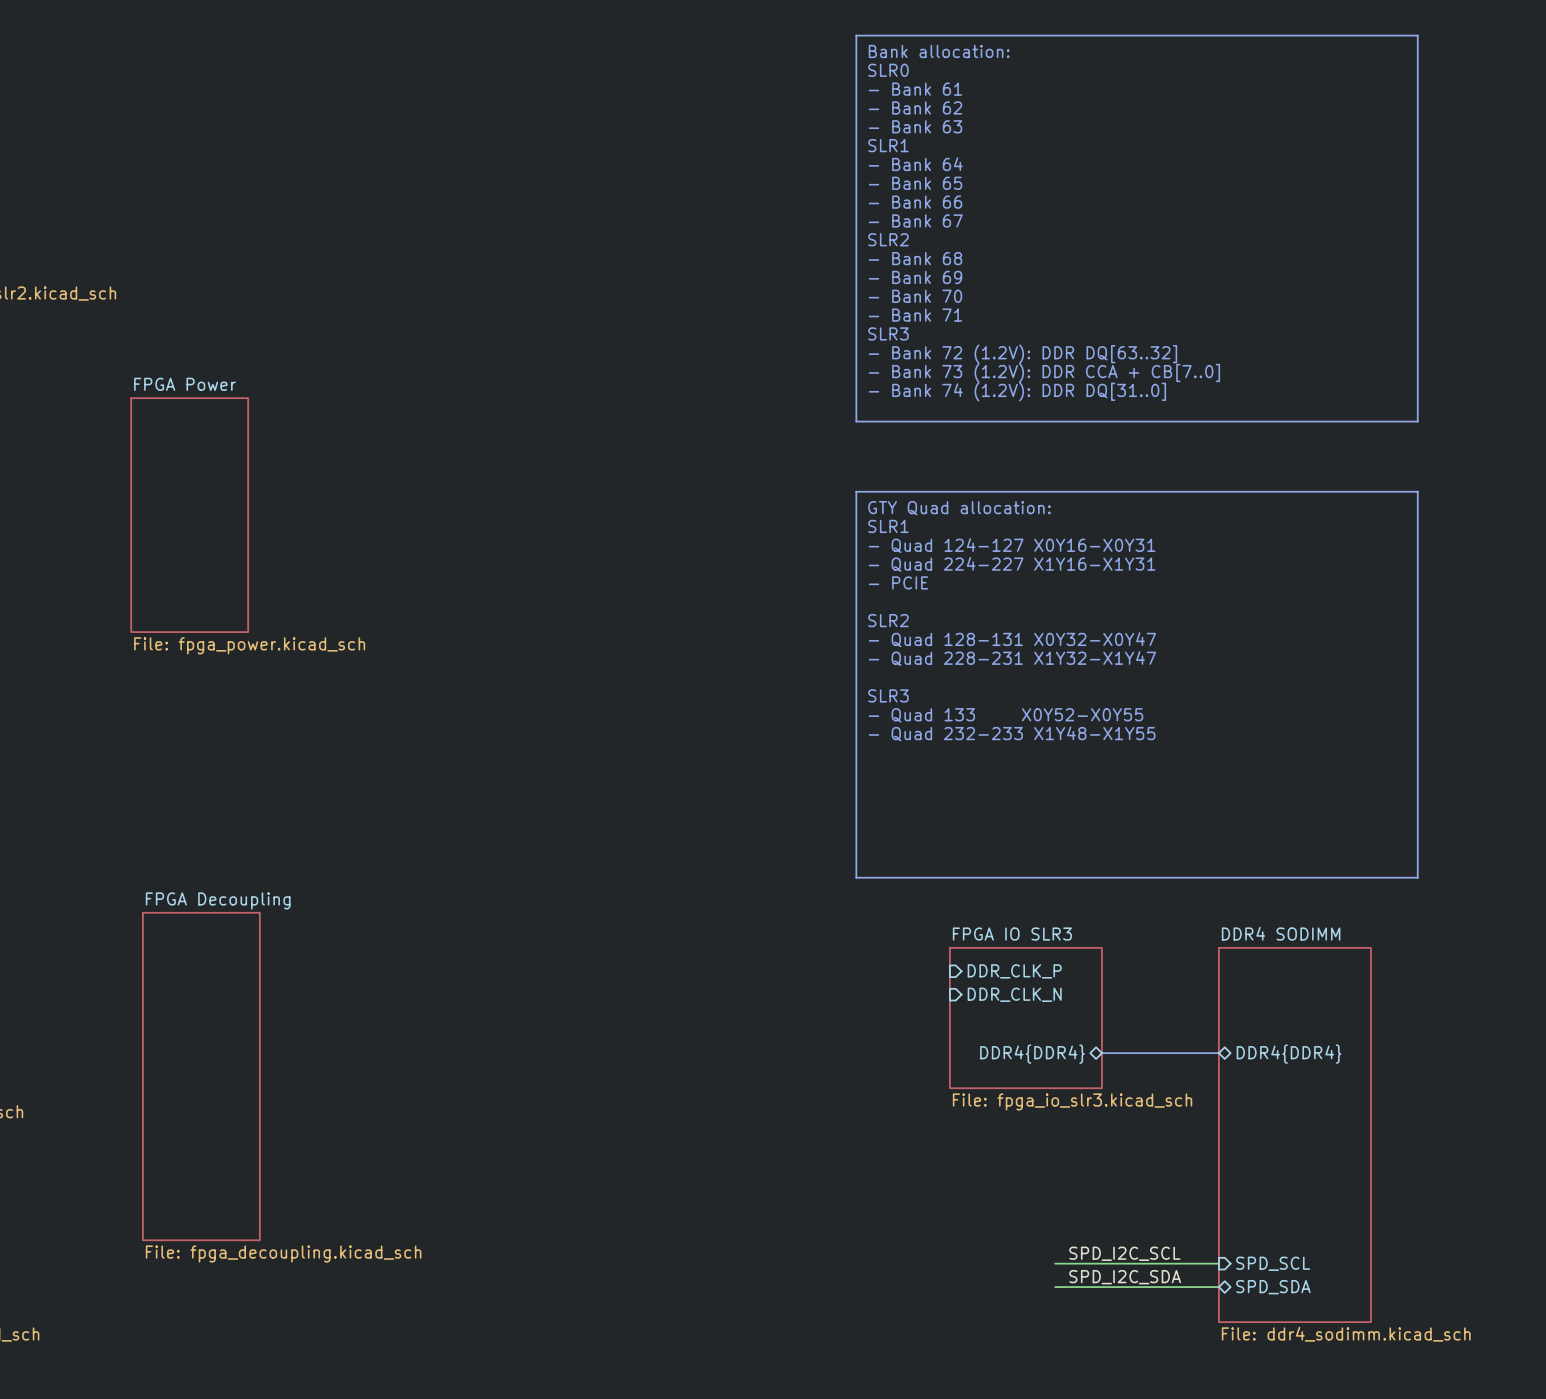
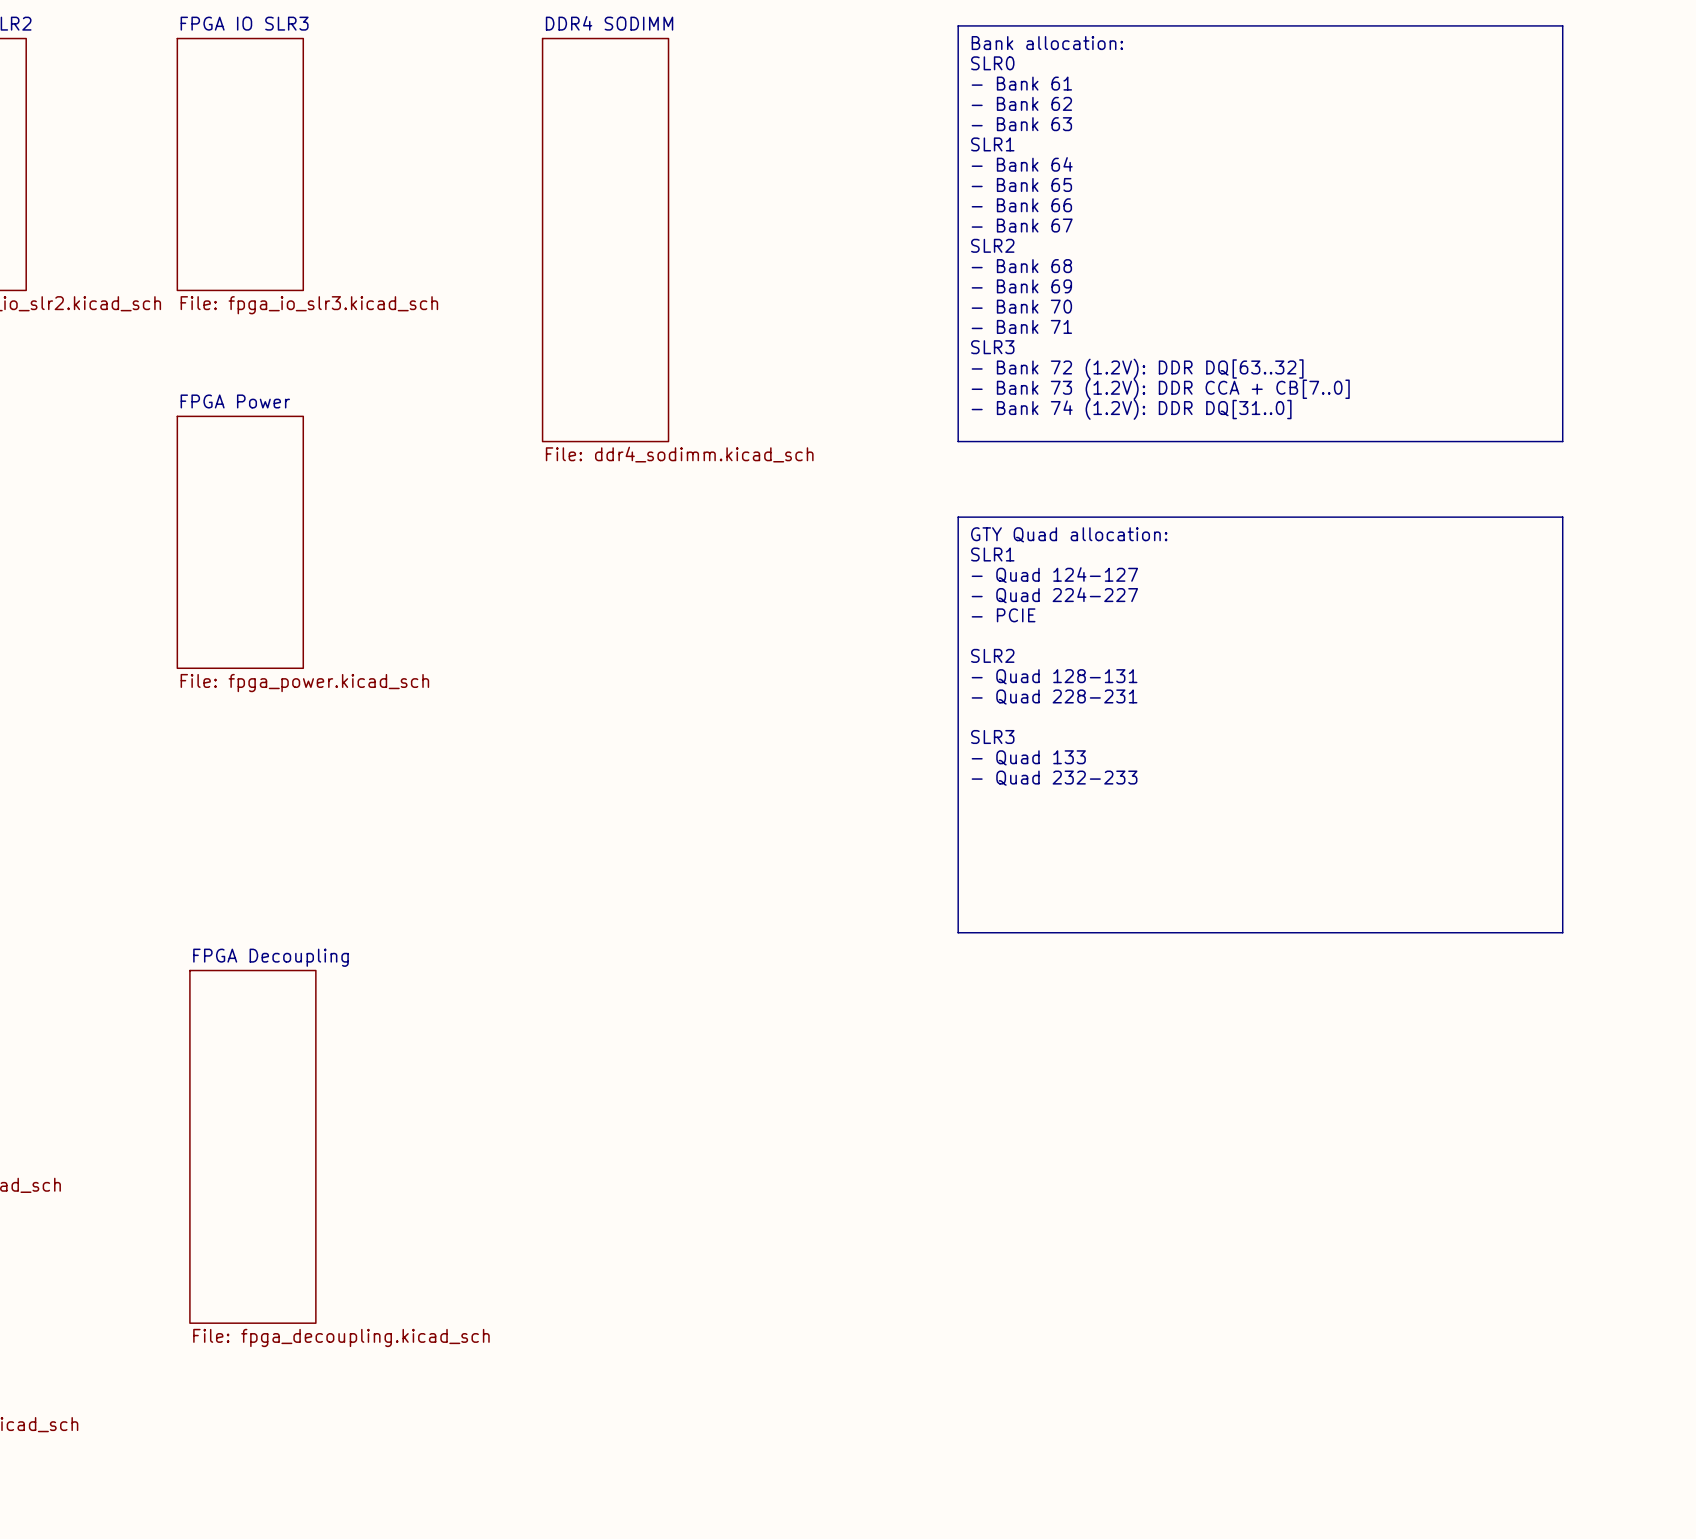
text: - Quad 124-127 X0Y16-X0Y31 (1012, 545) -> - Quad 124-127 (1054, 575)
text: - Quad 224-227 X1Y16-X1Y31 (1012, 564) -> - Quad 224-227 (1054, 595)
text: - Quad 128-131 X0Y32-X0Y47 (1012, 639) -> - Quad 128-131 (1054, 676)
text: - Quad 228-231 X1Y32-X1Y47 (1012, 658) -> - Quad 228-231 (1054, 697)
text: - Quad 133 X0Y52-X0Y55 (1005, 715) -> - Quad 133 (1028, 757)
text: - Quad 232-233 X1Y48-X1Y55 (1012, 733) -> - Quad 232-233 (1054, 778)
sheet FPGA IO SLR3 name position: FPGA IO SLR3 (1012, 934) -> FPGA IO SLR3 (244, 23)
sheet FPGA IO SLR3 shape: [949, 947, 1103, 1089] -> [176, 37, 305, 292]
sheet DDR4 SODIMM shape: [1218, 947, 1372, 1323] -> [541, 37, 670, 443]
sheet pin: DDR_CLK_P (1014, 971) -> none
sheet pin: DDR_CLK_N (1014, 994) -> none
bus: (1101, 1053) (1218, 1053) -> none
sheet pin: DDR4{DDR4} (1032, 1054) -> none
sheet pin: DDR4{DDR4} (1289, 1054) -> none
sheet FPGA IO SLR3 value position: File: fpga_io_slr3.kicad_sch (1072, 1101) -> File: fpga_io_slr3.kicad_sch (309, 305)
label: SPD_I2C_SCL (1124, 1253) -> none
wire: (1055, 1263) (1218, 1263) -> none
sheet pin: SPD_SCL (1273, 1263) -> none
label: SPD_I2C_SDA (1125, 1277) -> none
wire: (1055, 1287) (1218, 1287) -> none
sheet pin: SPD_SDA (1273, 1287) -> none

